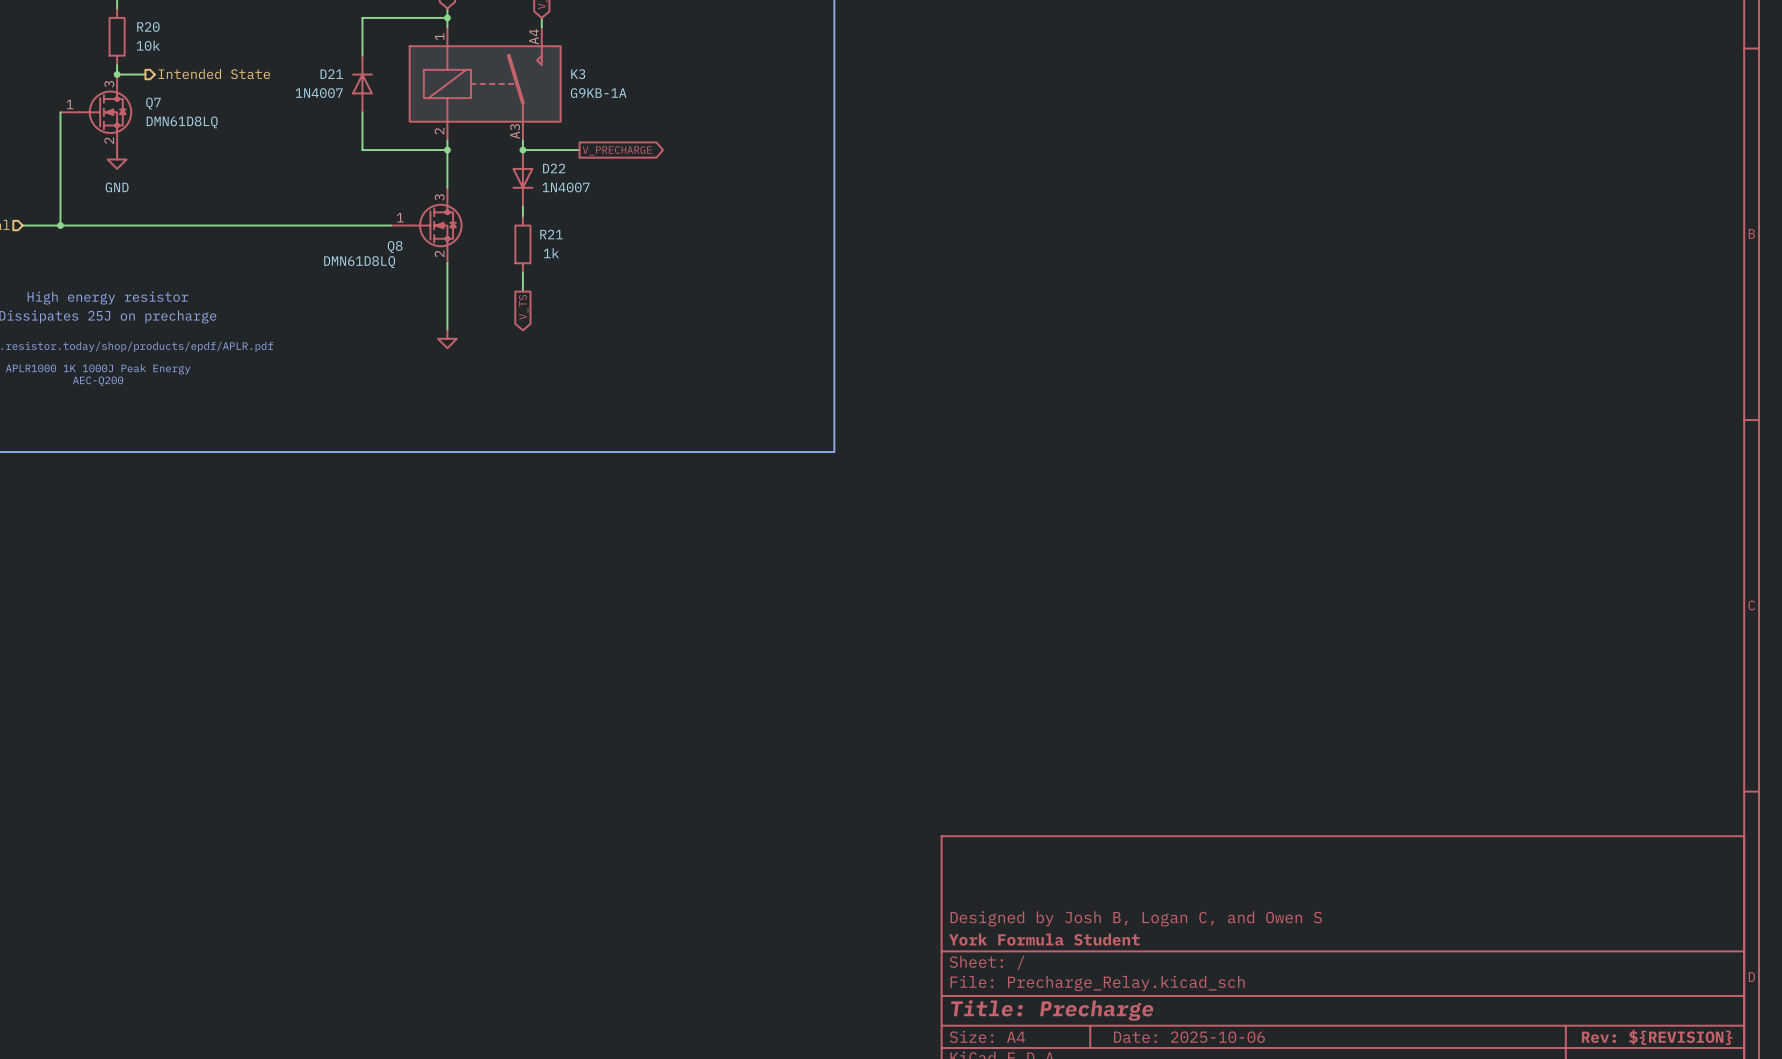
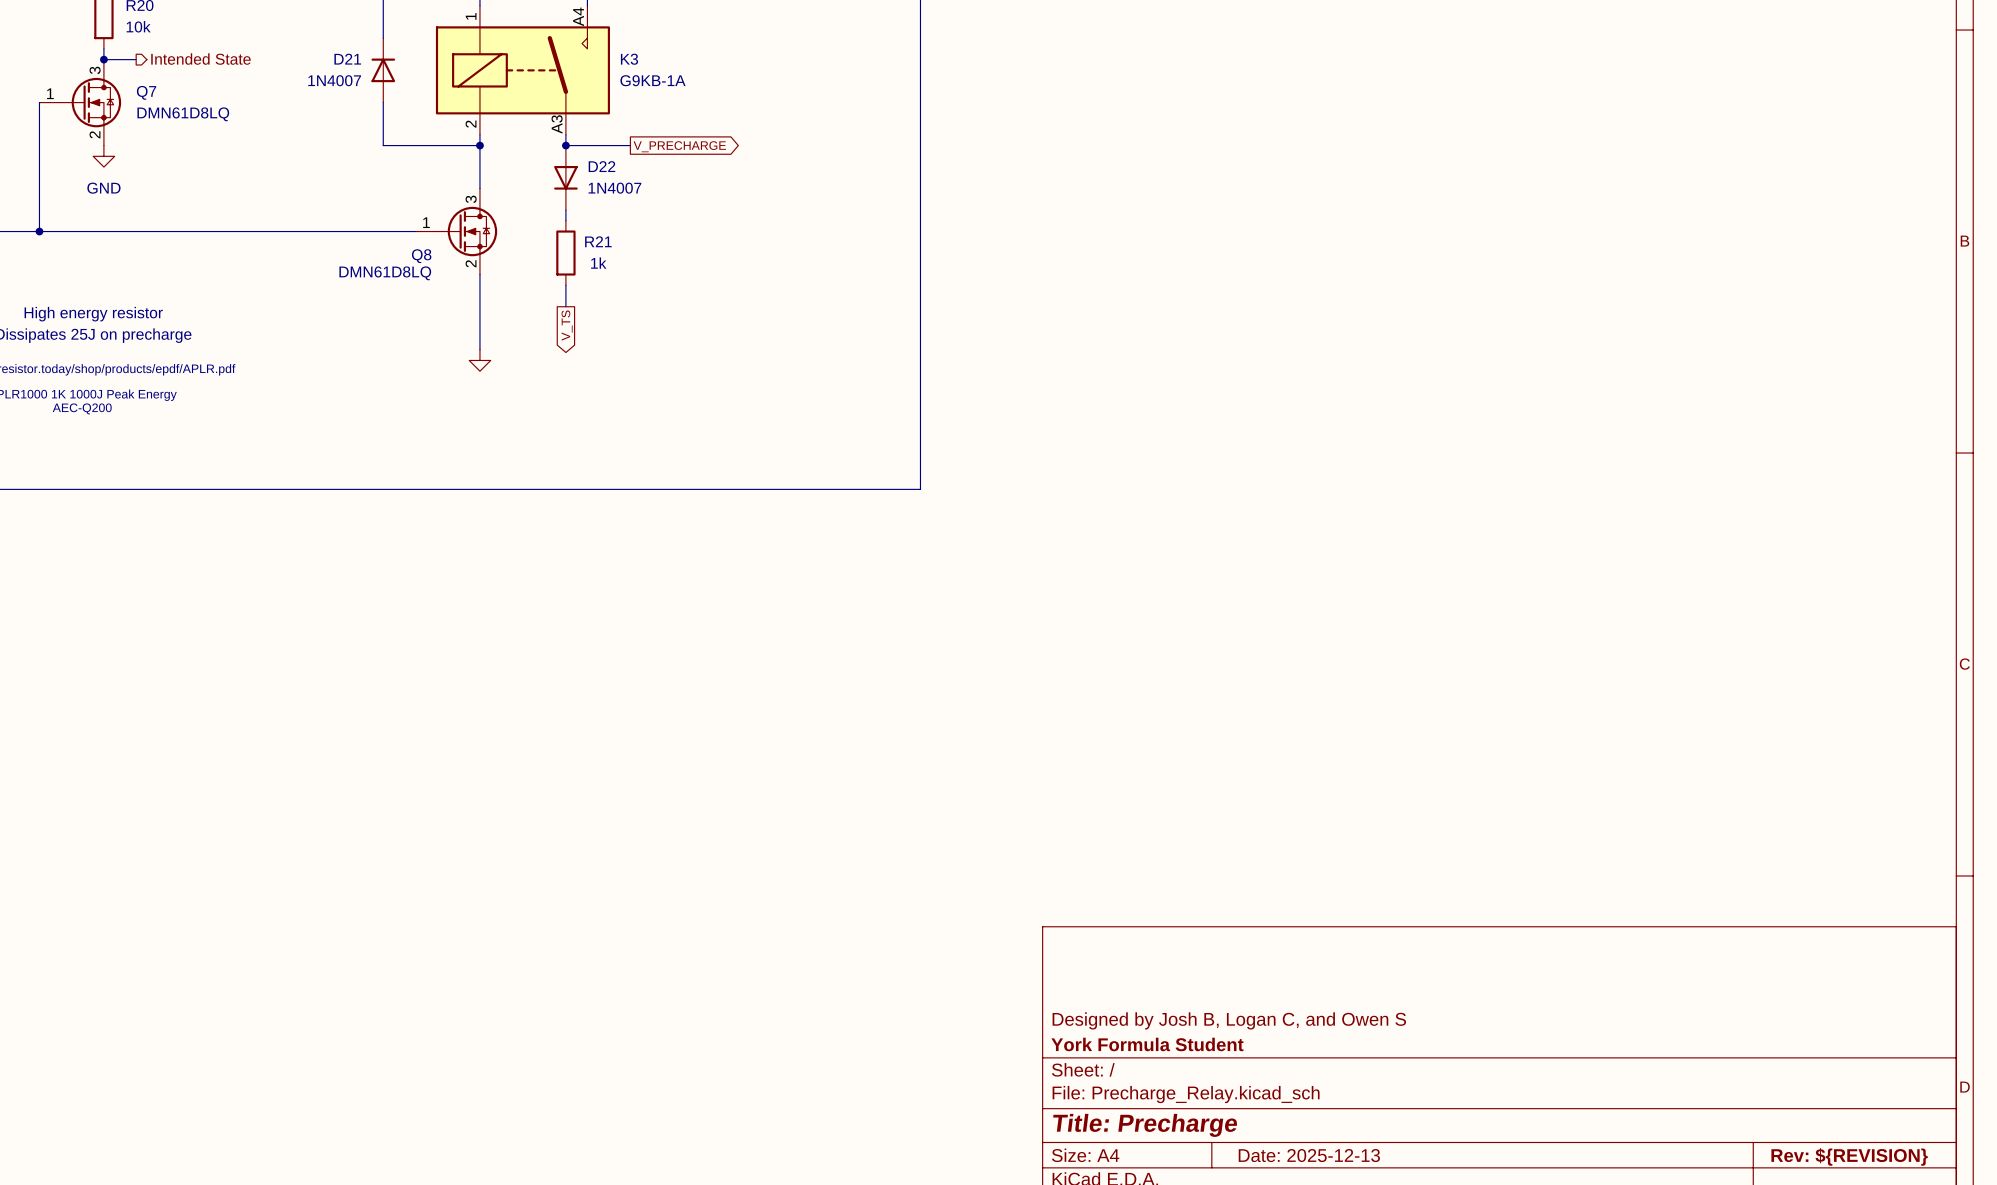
title block: Date: 2025-10-06 (1189, 1037) -> Date: 2025-12-13 (1309, 1155)

